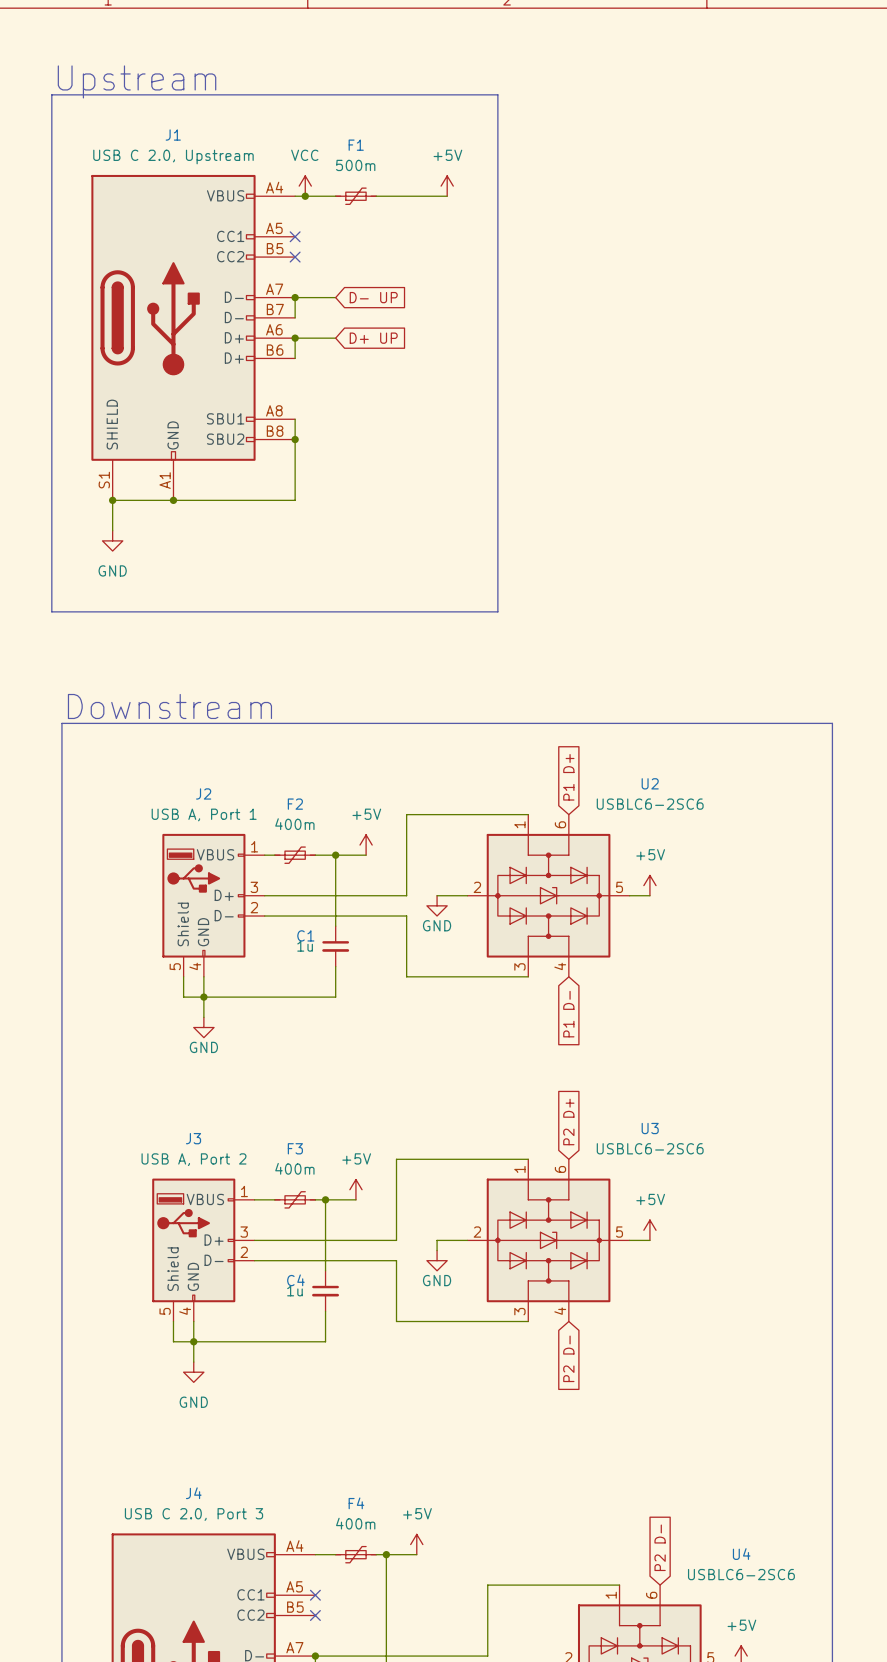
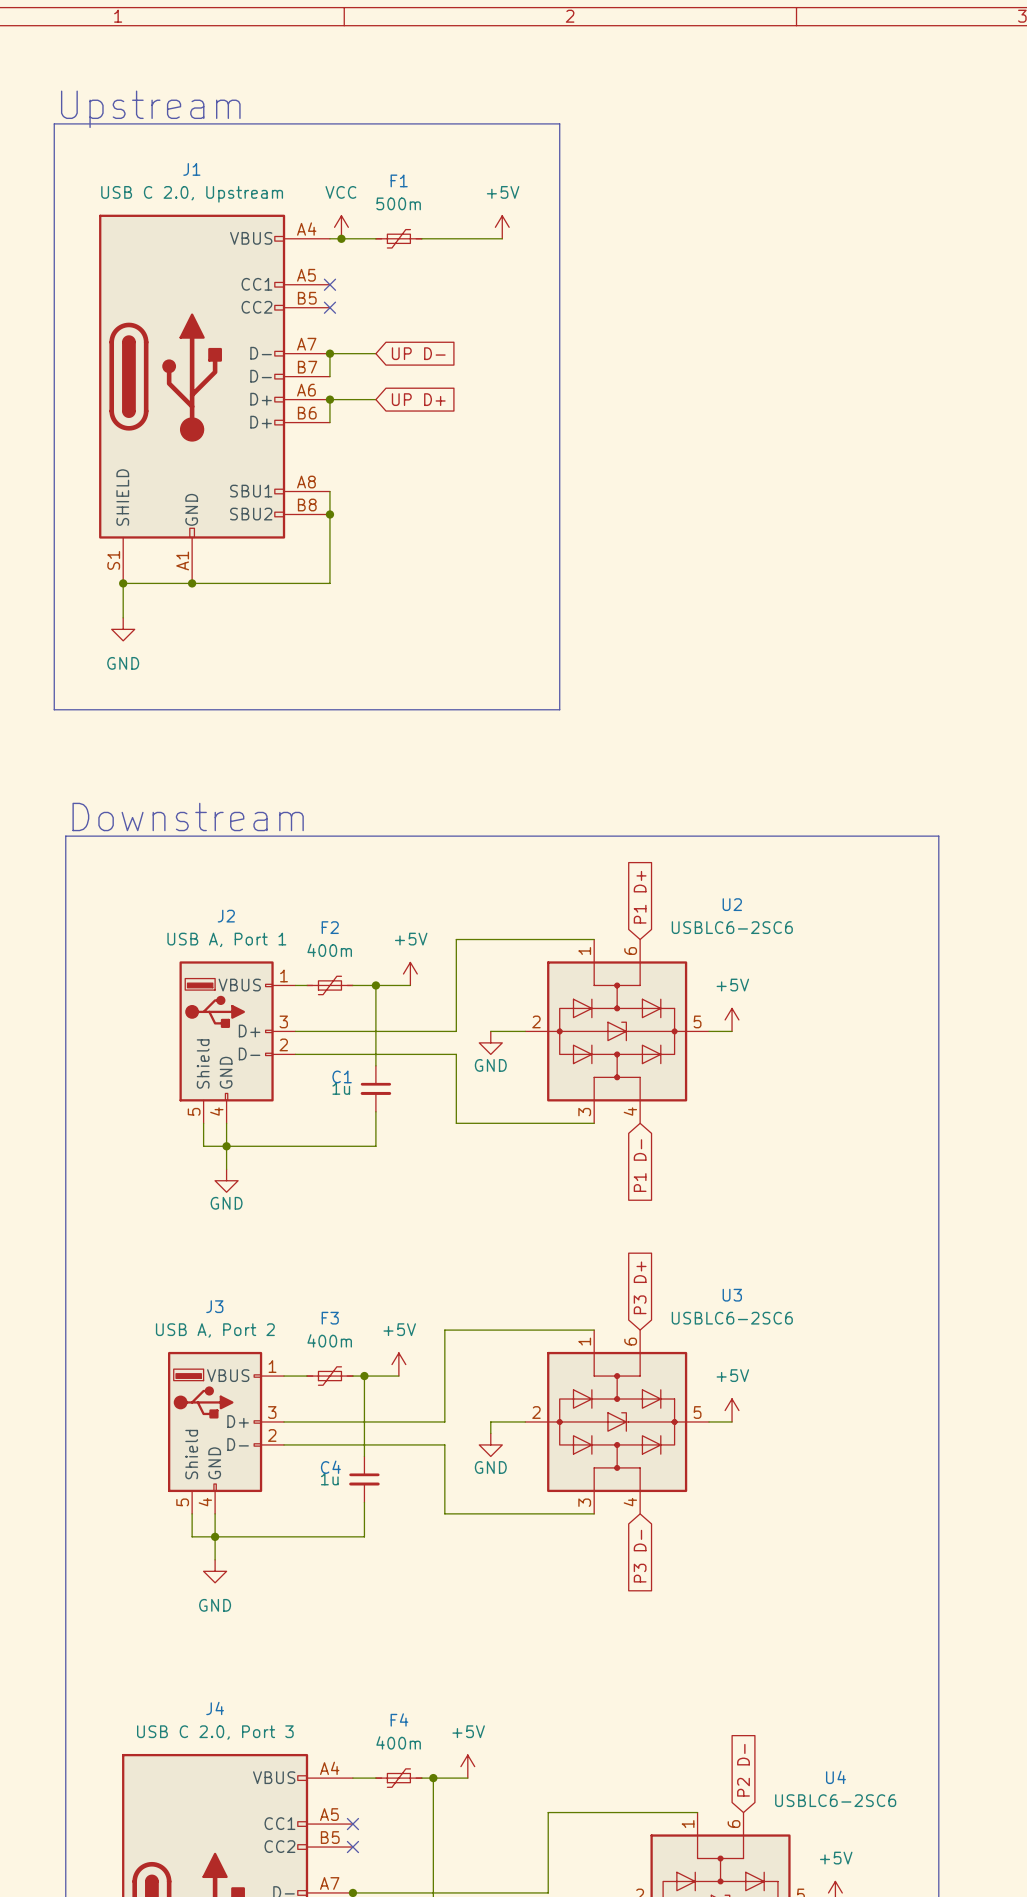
global label: D- UP (373, 297) -> UP D- (418, 353)
global label: D+ UP (373, 338) -> UP D+ (418, 399)
global label: P2 D+ (568, 1122) -> P3 D+ (640, 1287)
global label: P2 D- (568, 1358) -> P3 D- (640, 1556)

